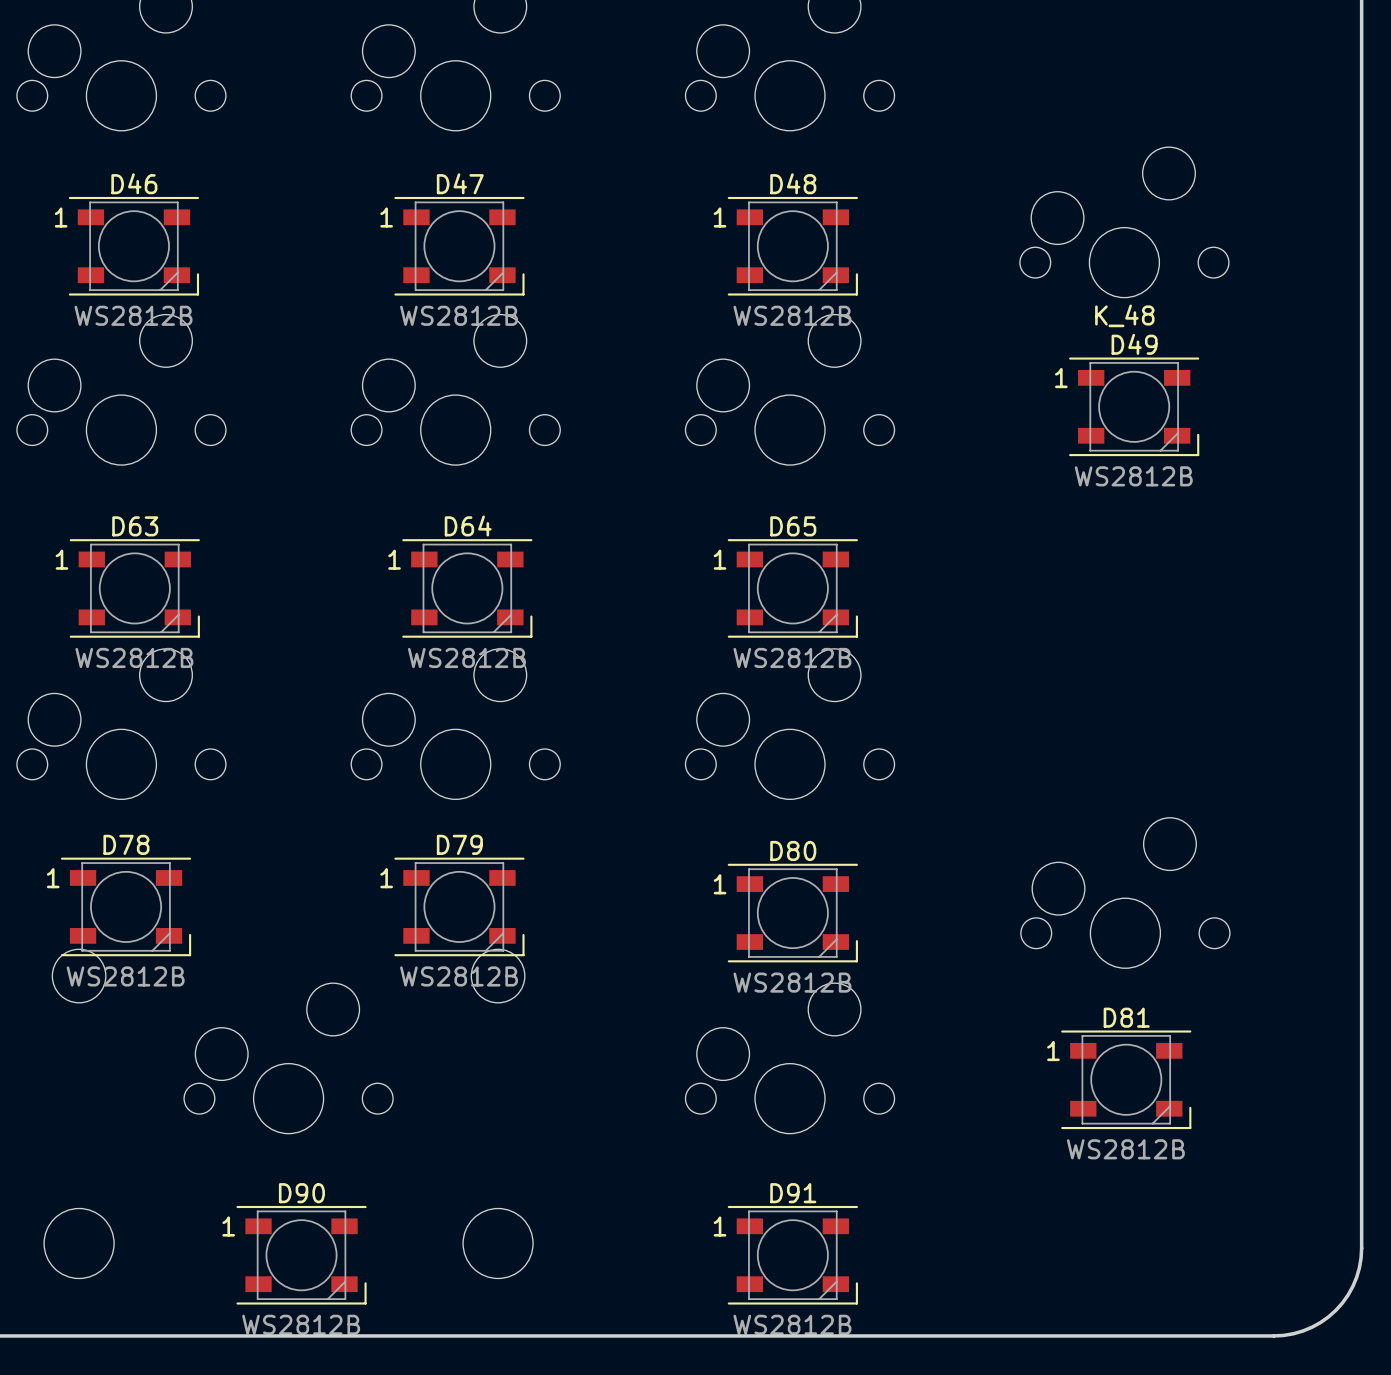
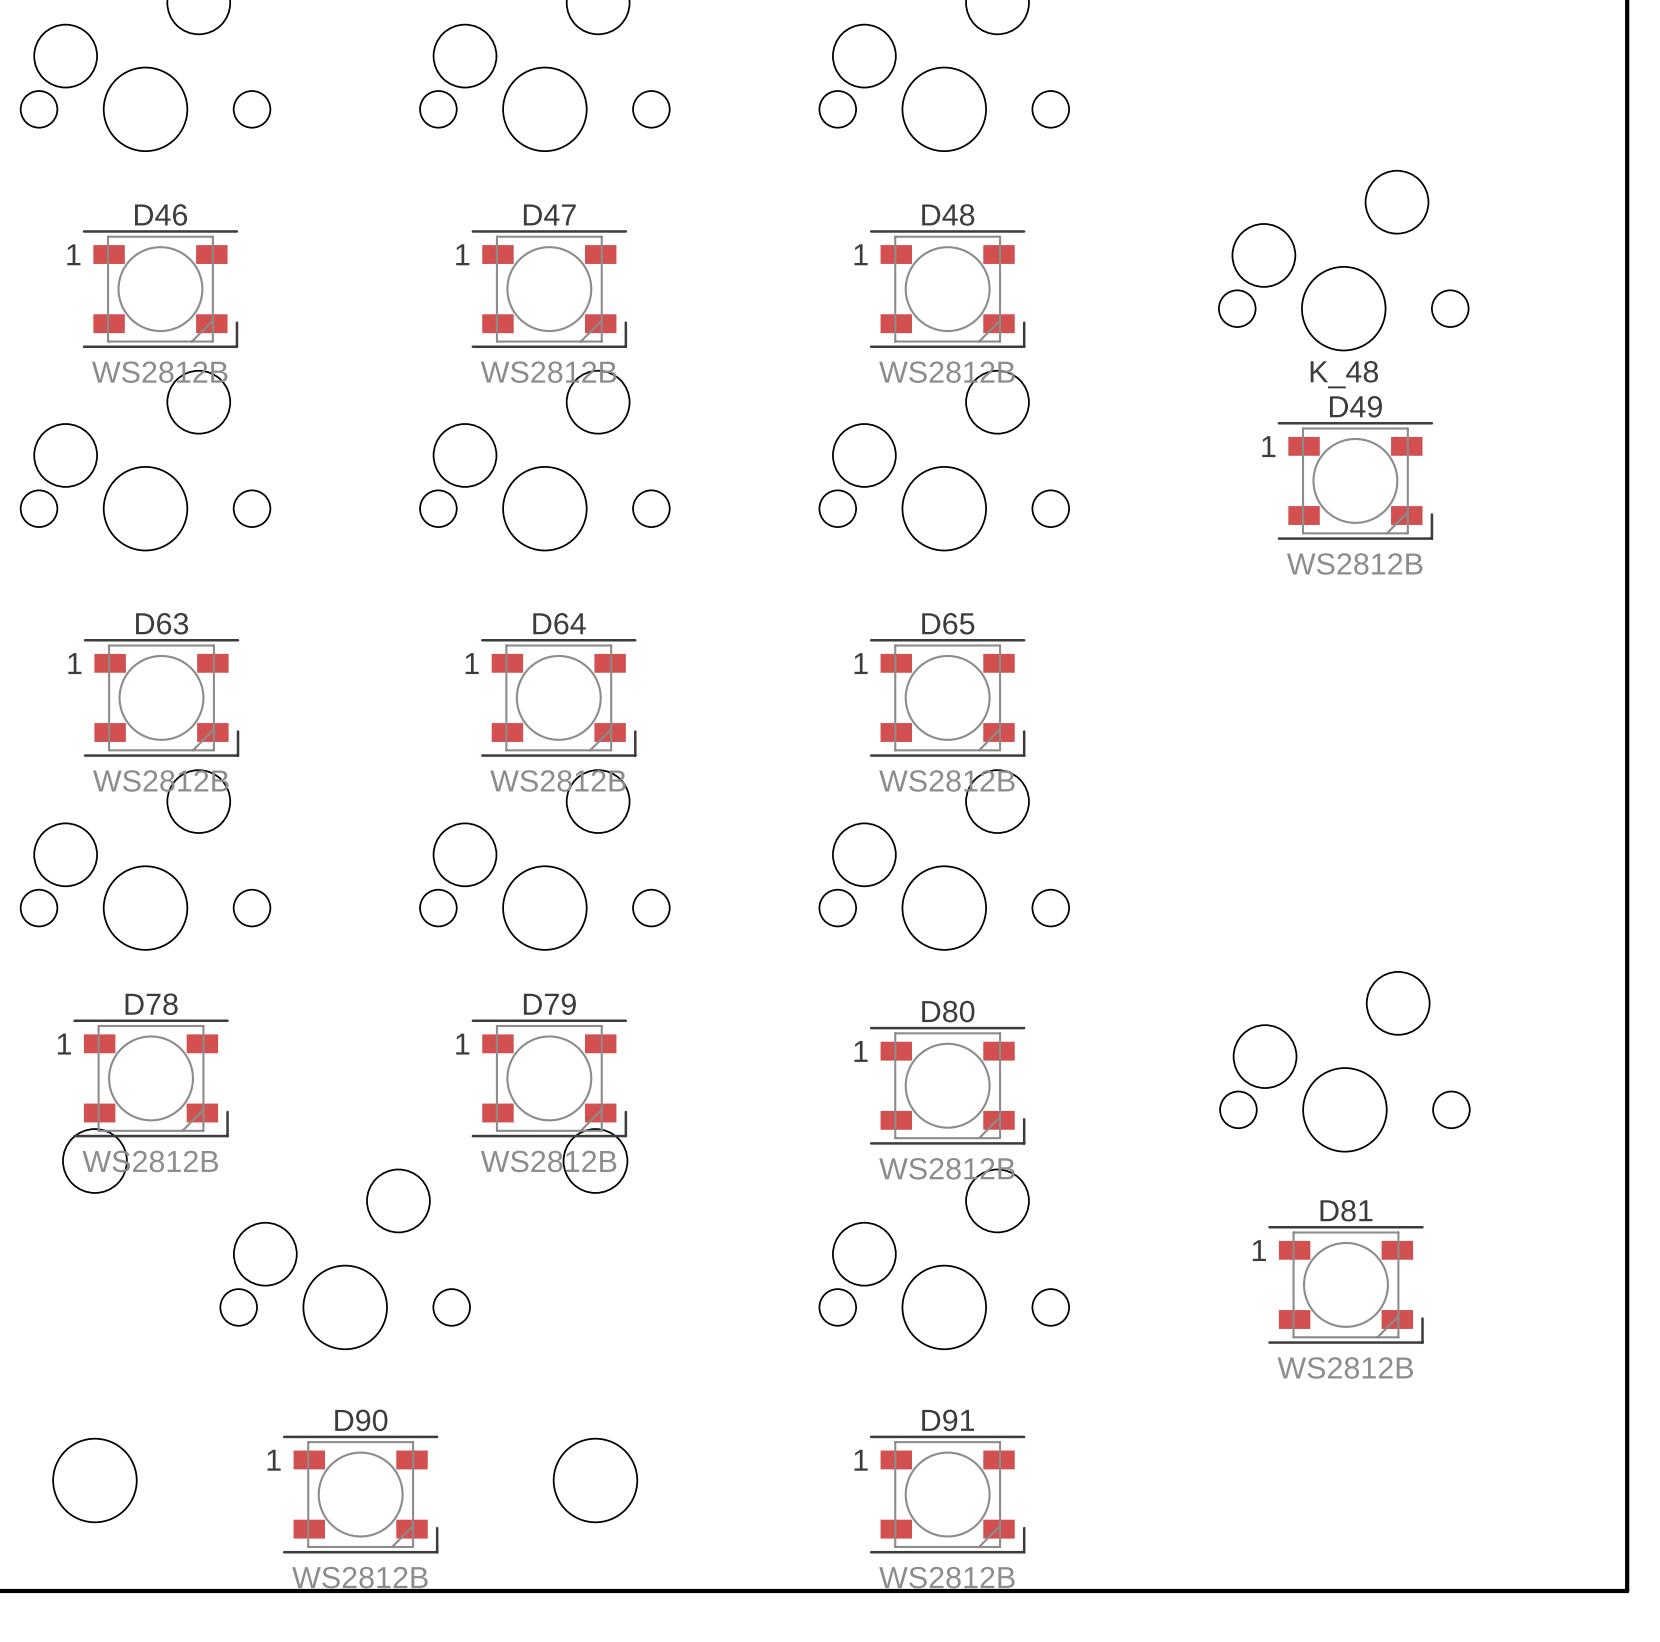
board edge: (1361, 1248) (1356, 1277) (1348, 1294) (1335, 1310) (1311, 1327) (1293, 1333) (1273, 1335) -> (1627, 1486) (1627, 1590) (1522, 1590)

